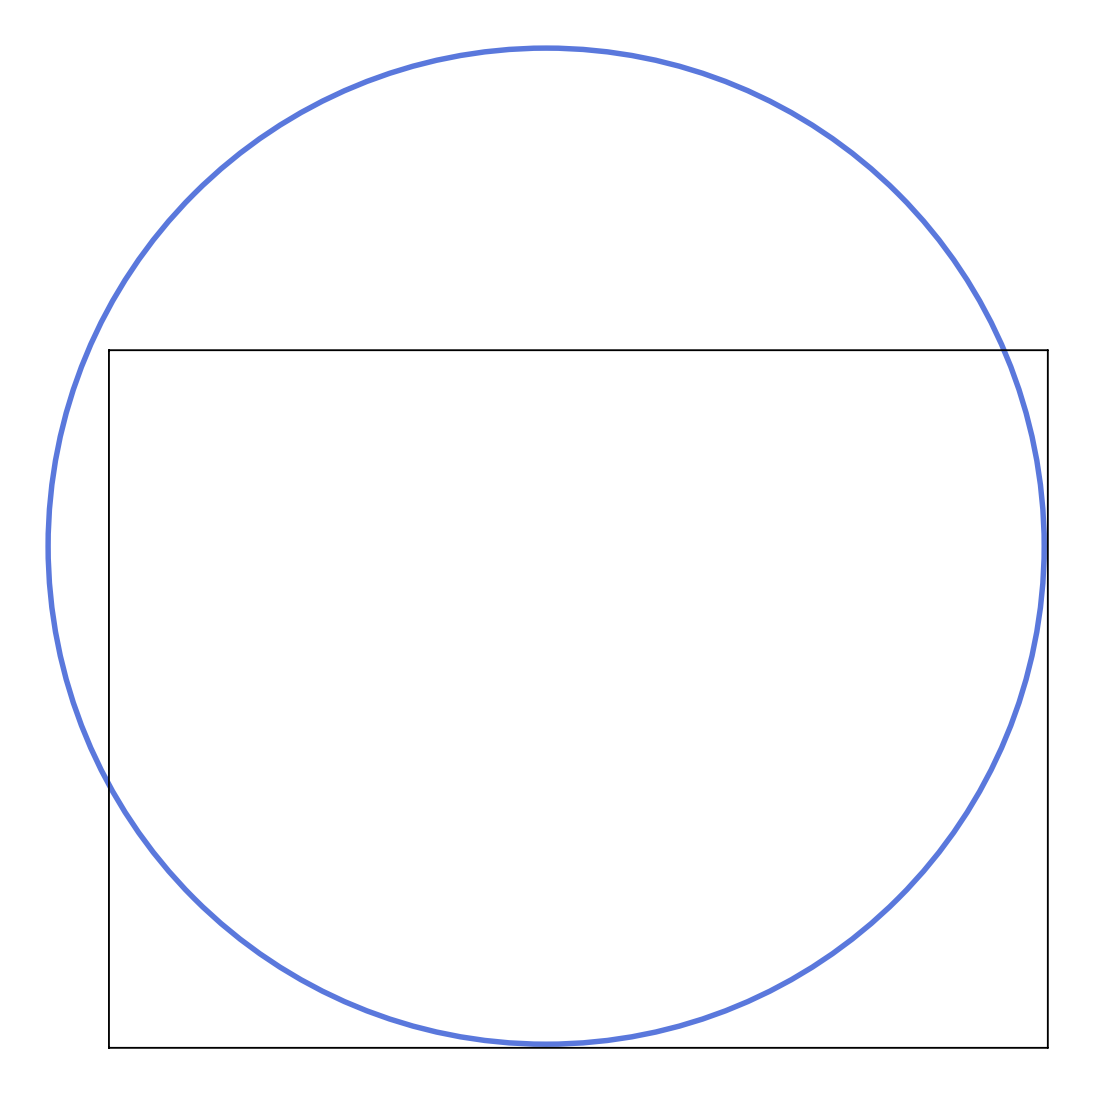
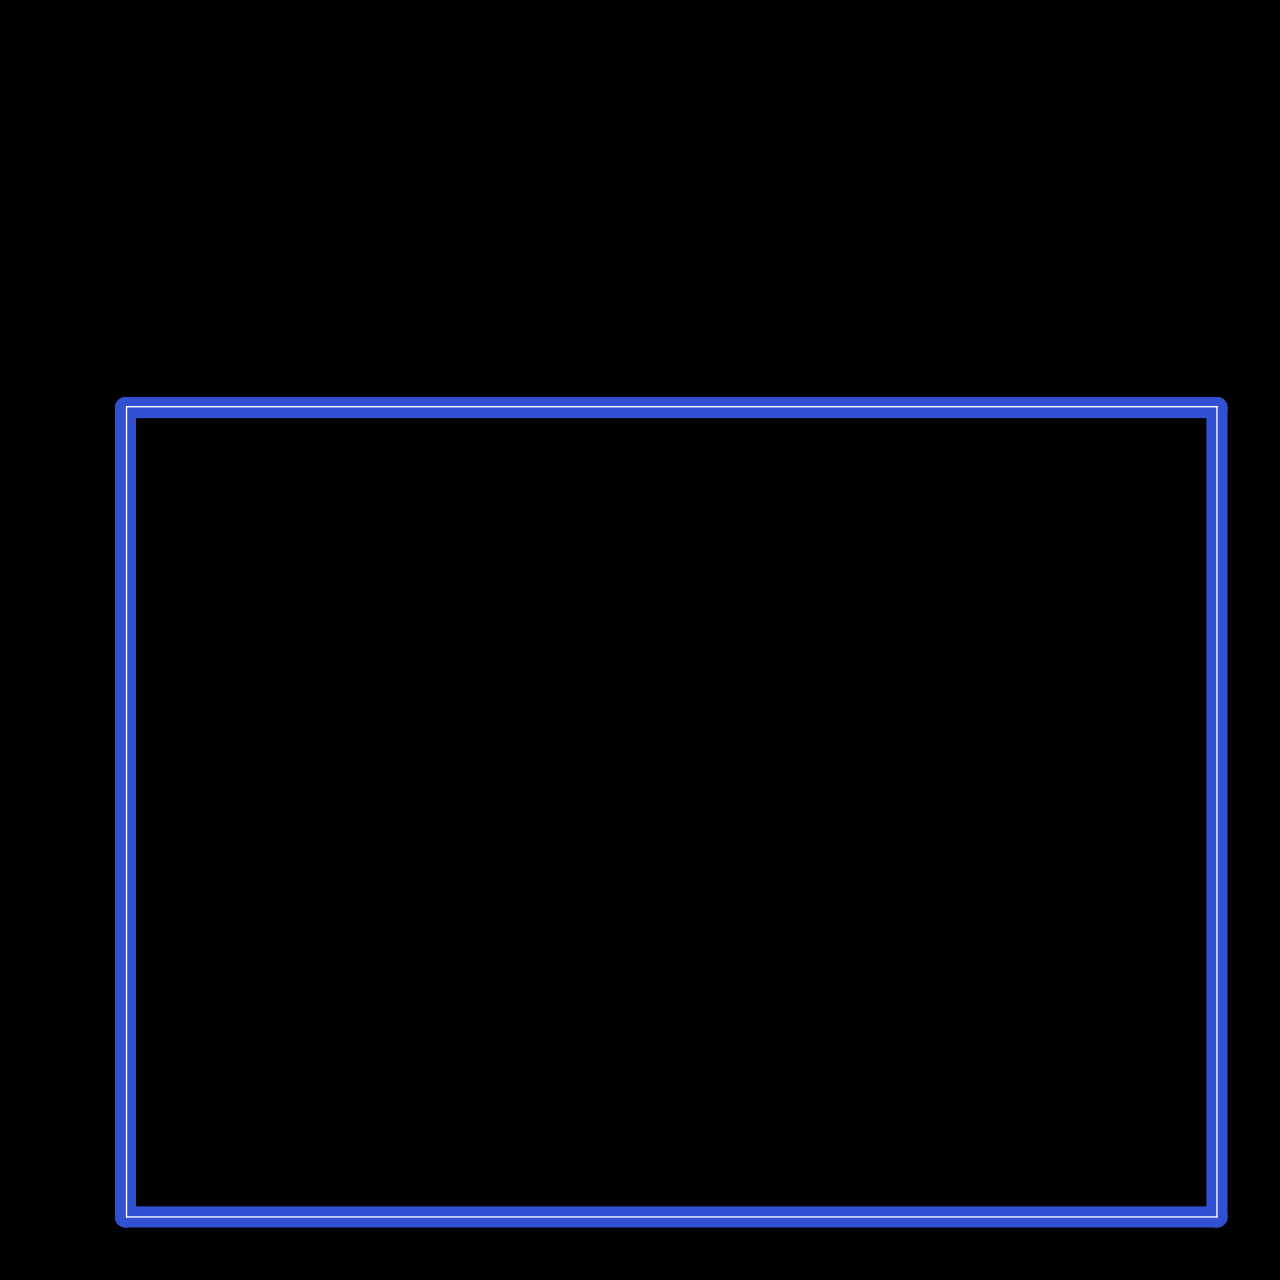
drawing: [45, 45, 1047, 1047] -> none
track: none -> (1216, 407) (1216, 1216) (125, 1216) (125, 407) (1216, 407)

